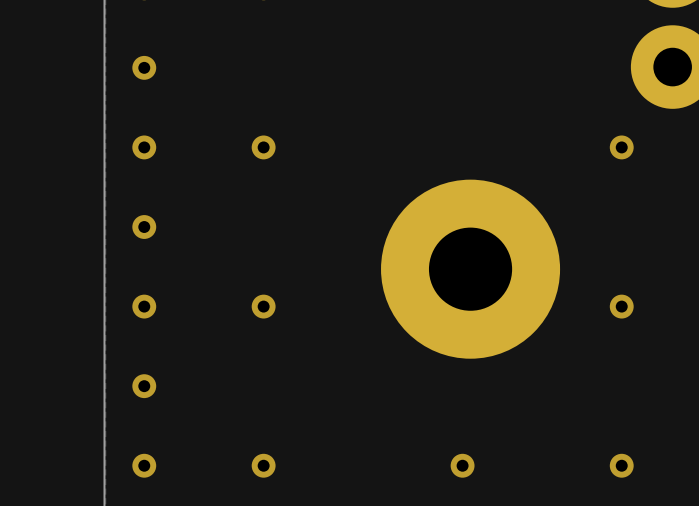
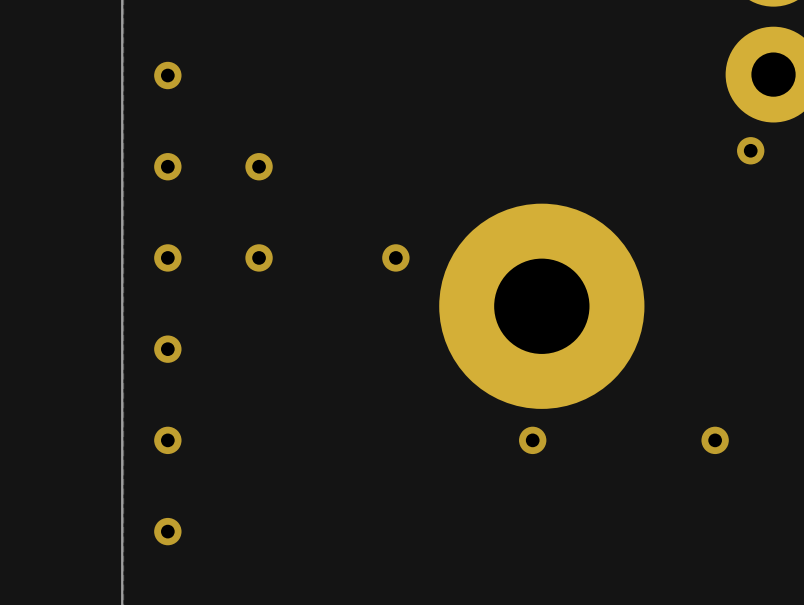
via position: (263, 147) -> (259, 166)
via position: (621, 147) -> (750, 150)
via: none -> (259, 257)
via: none -> (395, 257)
via: (263, 306) -> none
via: (621, 306) -> none
via: none -> (715, 440)
via: (263, 465) -> none
via position: (462, 465) -> (532, 440)
via: (621, 465) -> none

